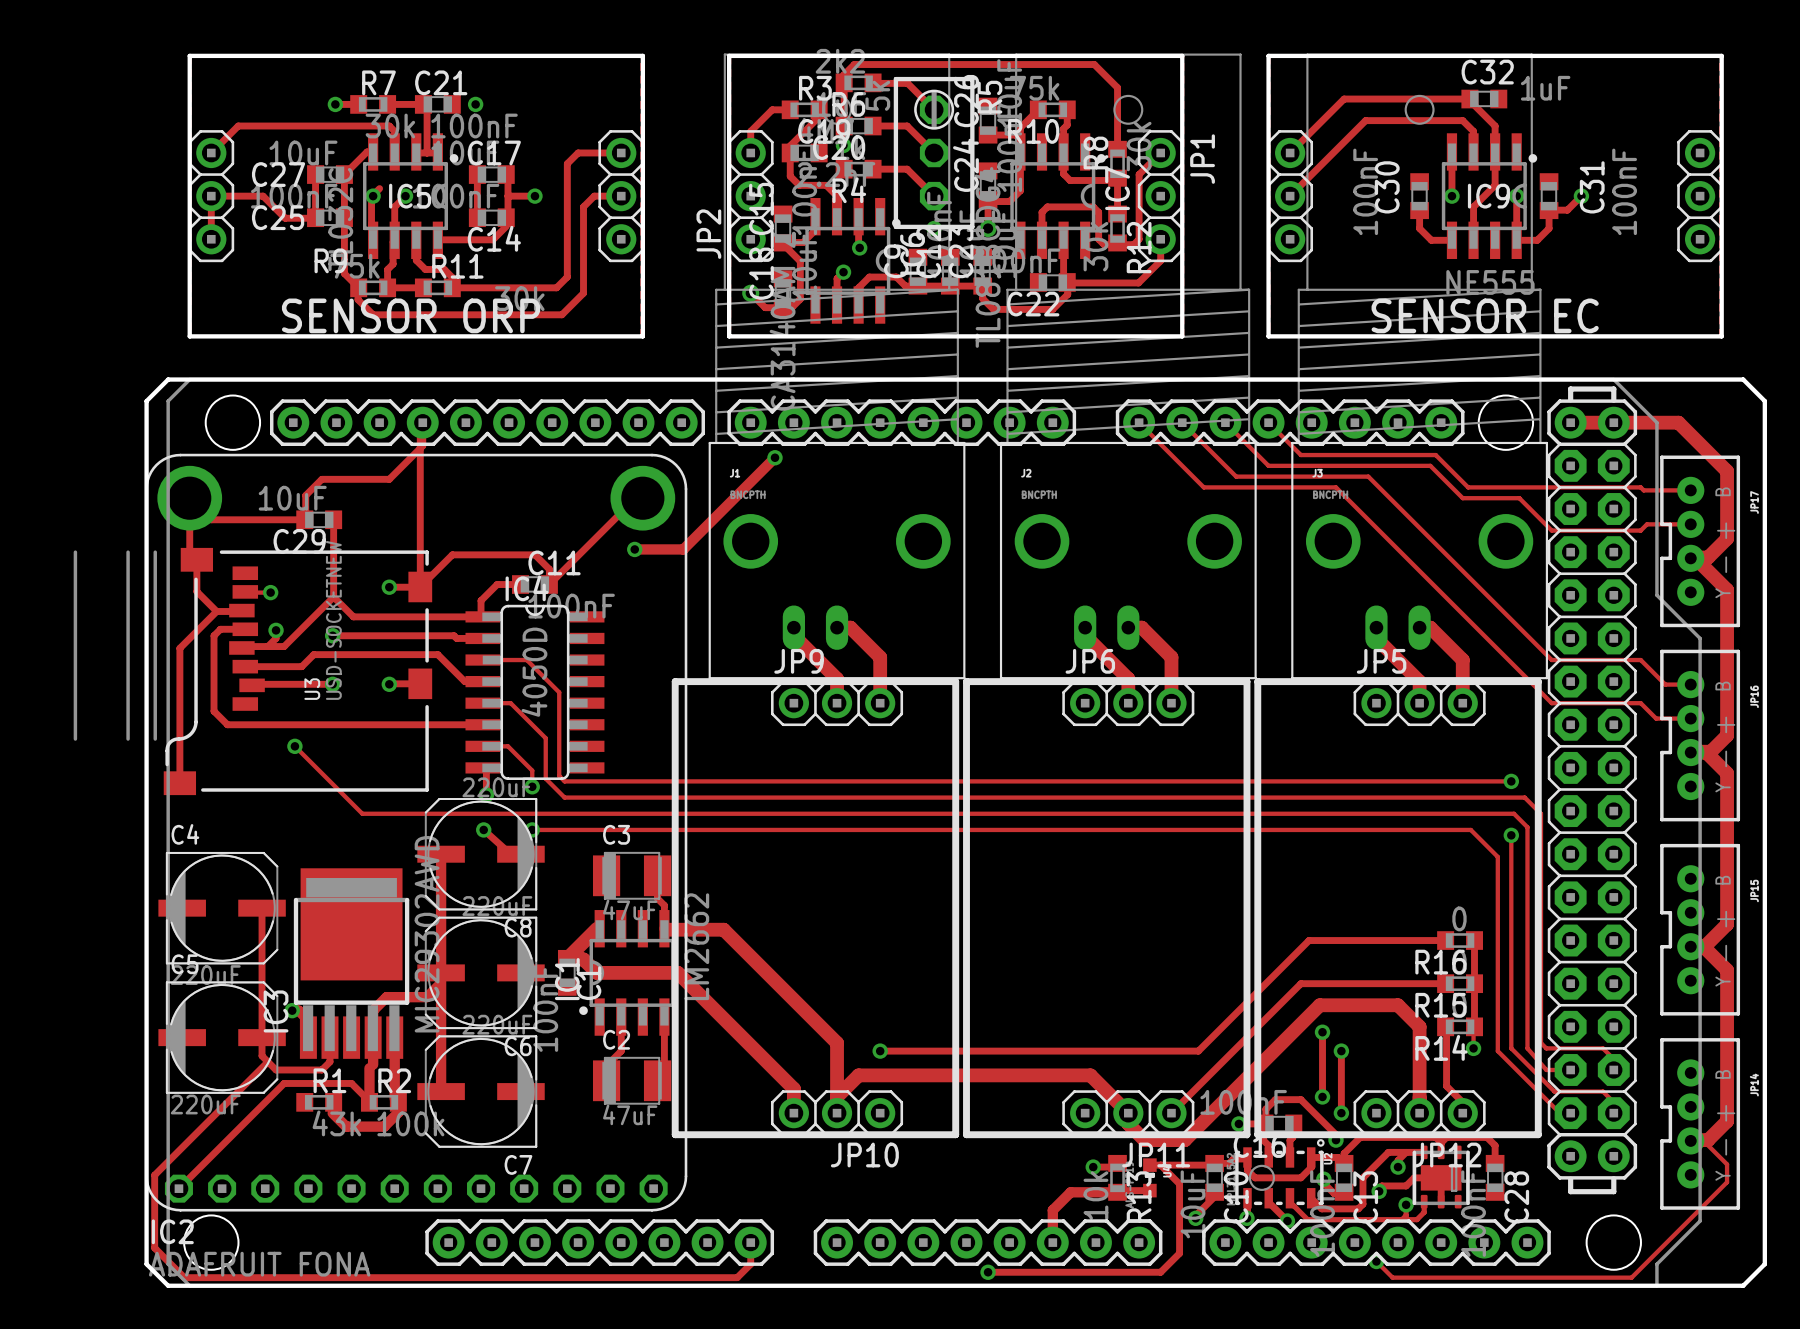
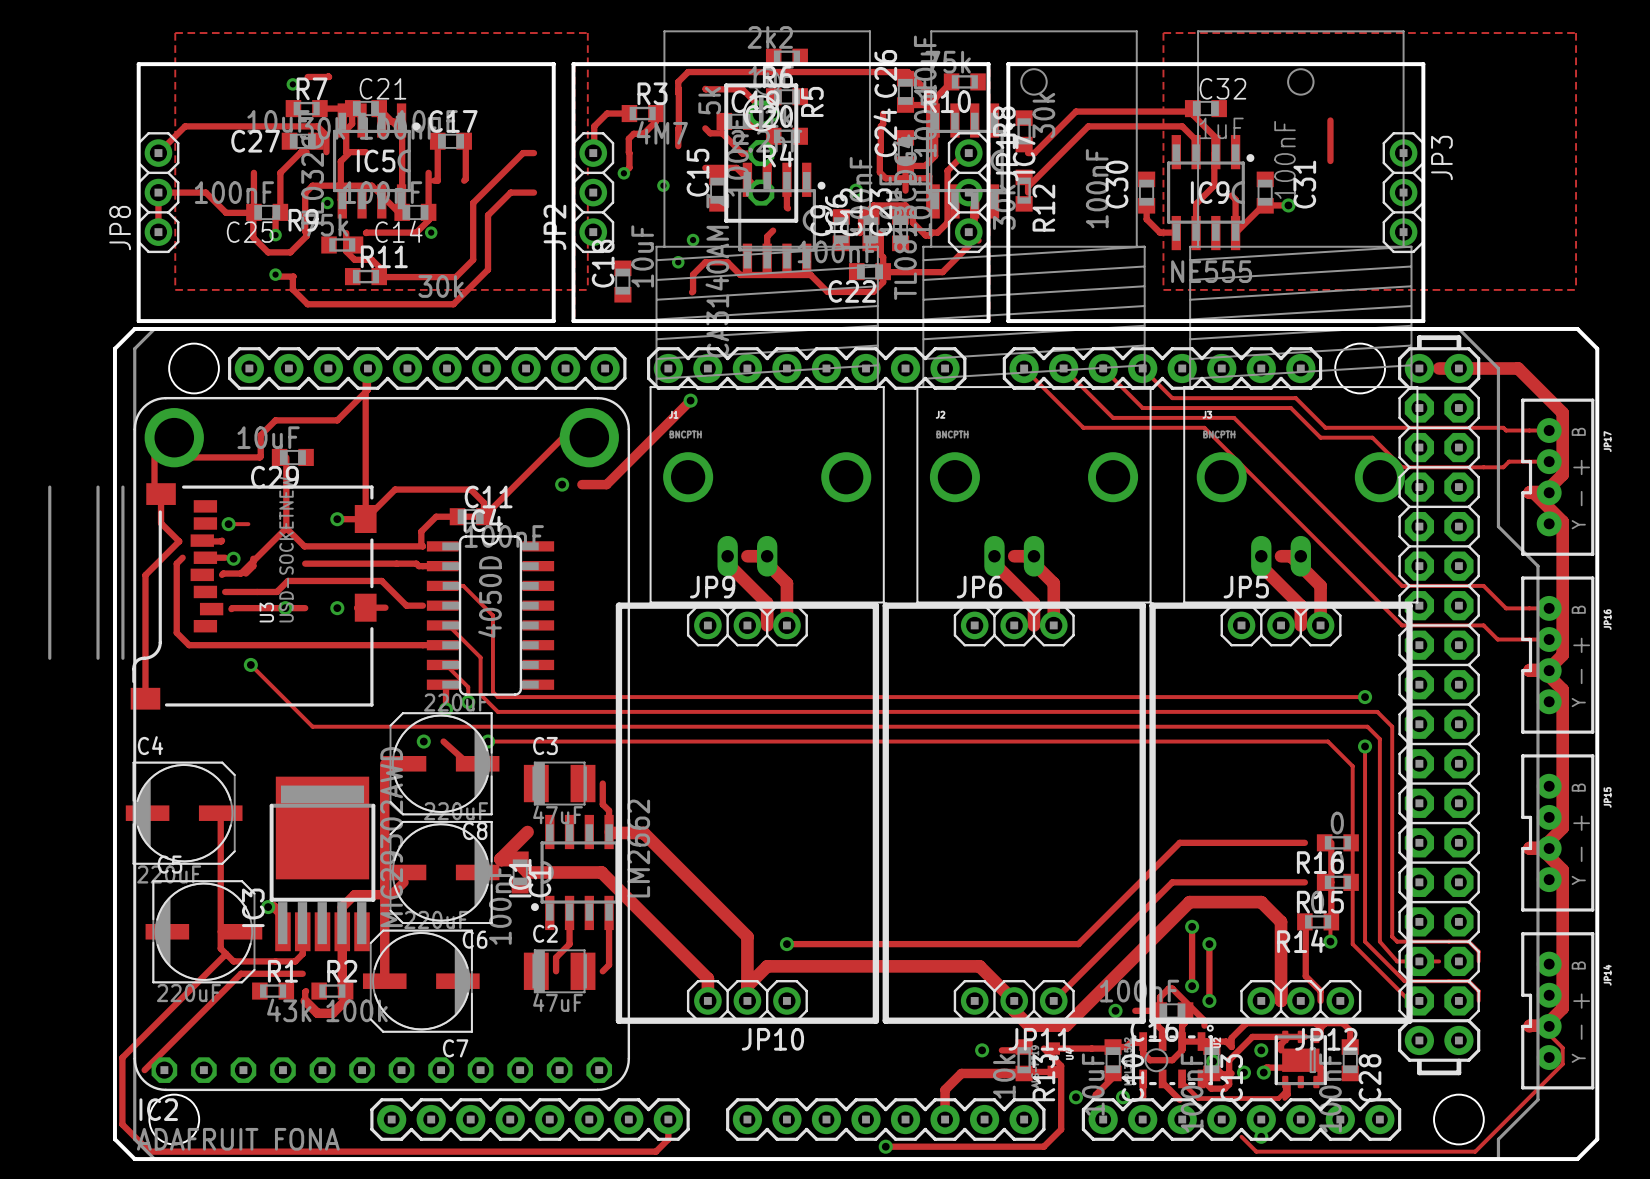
board edge: (189, 55) (642, 55) (642, 336) (189, 336) (189, 55) -> (138, 64) (553, 64) (553, 321) (138, 321) (138, 64)
board edge: (729, 55) (1182, 55) (1182, 336) (729, 336) (729, 55) -> (573, 64) (988, 64) (988, 321) (573, 321) (573, 64)
board edge: (1268, 55) (1721, 55) (1721, 336) (1268, 336) (1268, 55) -> (1008, 64) (1423, 64) (1423, 321) (1008, 321) (1008, 64)
C32 name position: C32 (1487, 72) -> C32 (1222, 88)
C21 name position: C21 (441, 82) -> C21 (382, 88)
track: (873, 82) (907, 83) (934, 109) -> none
C32 value position: 1uF (1545, 88) -> 1uF (1221, 128)
C32 position: (1484, 99) -> (1205, 108)
via: (335, 104) -> none
R7 position: (373, 104) -> (306, 108)
track: (387, 104) (423, 104) (427, 109) (427, 152) -> none
C21 position: (437, 104) -> (365, 108)
via: (475, 104) -> none
track: (790, 109) (772, 109) (750, 131) (750, 152) -> none
R3 position: (804, 109) -> (642, 113)
track: (819, 109) (818, 117) (790, 145) (790, 176) (799, 185) (826, 185) (837, 196) (837, 216) -> none
track: (1068, 111) (1067, 109) (1067, 125) (1063, 128) (1063, 174) (1070, 180) (1115, 180) (1117, 178) (1117, 214) -> none
via: none -> (292, 84)
track: none -> (705, 88) (742, 89) (761, 108) (761, 113)
track: (873, 126) (907, 126) (934, 152) -> none
track: none -> (319, 108) (352, 108) (352, 123) (346, 129) (346, 152) (365, 152)
track: none -> (379, 108) (402, 131) (402, 212) (398, 212) (371, 185) (312, 185) (305, 193) (306, 236) (290, 252) (268, 252) (253, 237) (253, 172)
track: none -> (629, 113) (607, 113) (594, 126) (593, 153)
track: none -> (655, 113) (655, 121) (643, 133) (633, 133) (628, 138) (629, 167) (623, 173)
track: none -> (883, 113) (883, 124) (880, 126) (879, 172) (885, 178) (927, 178) (929, 176) (929, 209)
track: (843, 145) (843, 75) (854, 64) (1094, 64) (1117, 87) (1117, 149) -> (678, 146) (678, 81) (688, 72) (908, 72) (929, 93) (929, 149)
track: (373, 151) (367, 151) (344, 174) (344, 273) (358, 287) (358, 299) (373, 314) (561, 314) (583, 293) (583, 206) (594, 196) (621, 196) -> none
track: (394, 151) (394, 131) (389, 126) (238, 126) (211, 152) -> none
track: (1473, 151) (1473, 131) (1462, 120) (1365, 120) (1290, 196) -> none
track: (621, 152) (578, 152) (567, 163) (567, 277) (556, 287) (452, 287) -> none
R5 position: (934, 152) -> (761, 153)
track: (1160, 152) (1139, 174) (1139, 239) (1133, 244) (1119, 244) (1117, 242) (1115, 244) (1104, 244) (1098, 239) (1098, 212) (1093, 206) (1047, 206) (1042, 212) (1042, 240) -> none
track: (1290, 152) (1344, 99) (1469, 99) (1495, 126) (1495, 185) (1473, 206) (1473, 240) -> none
track: none -> (705, 128) (710, 133) (722, 133) (742, 153) (761, 153)
track: (873, 169) (907, 169) (934, 196) -> (705, 167) (736, 167) (761, 192)
track: (315, 174) (314, 218) (285, 218) (263, 196) (211, 196) (211, 239) -> none
track: none -> (306, 152) (301, 152) (280, 172) (280, 212) (275, 217) (275, 235)
track: none -> (326, 152) (326, 135) (317, 126) (185, 126) (158, 153)
track: none -> (1196, 152) (1197, 141) (1182, 126) (1088, 126) (1028, 186) (1028, 192)
track: none -> (533, 153) (523, 153) (473, 202) (473, 259) (455, 277) (379, 276)
track: none -> (968, 153) (965, 153) (947, 170) (947, 222) (937, 232) (925, 235) (912, 222) (912, 212) (905, 205) (873, 205) (861, 217) (860, 233)
track: none -> (1028, 153) (1034, 153) (1075, 111) (1190, 111) (1192, 108) (1192, 114) (1216, 138) (1216, 151) (1214, 153) (1214, 185) (1196, 203) (1196, 233)
C31 value position: 100nF (1624, 191) -> 100nF (1285, 159)
part: (211, 196) -> none
via: (373, 196) -> none
track: (405, 196) (394, 206) (393, 264) (387, 269) (387, 287) (423, 287) -> none
via: (405, 196) -> none
track: (507, 196) (534, 196) -> none
via: (534, 196) -> none
part: (621, 196) -> none
JP2 position: (750, 196) -> (593, 192)
JP1 position: (1160, 196) -> (968, 192)
part: (1290, 196) -> none
C30 position: (1419, 196) -> (1146, 192)
via: (1451, 196) -> none
IC9 position: (1489, 196) -> (1210, 192)
track: (1516, 196) (1516, 240) (1537, 240) (1549, 228) (1549, 210) -> none
via: (1516, 196) -> none
C31 position: (1549, 196) -> (1265, 192)
track: (1581, 196) (1567, 210) (1549, 210) -> none
via: (1581, 196) -> none
part: (1700, 196) -> none
track: none -> (428, 172) (428, 220) (416, 232) (365, 233)
via: none -> (623, 173)
track: (1419, 210) (1419, 228) (1431, 240) (1451, 240) -> none
track: (815, 216) (815, 230) (803, 242) (783, 242) (800, 261) (800, 299) (792, 307) (765, 307) (750, 293) -> none
C25 name position: C25 (278, 217) -> C25 (250, 232)
C25 position: (329, 217) -> (267, 212)
C14 position: (491, 217) -> (415, 212)
via: none -> (663, 185)
track: (506, 226) (492, 239) (437, 240) -> none
via: (988, 228) -> none
JP8: none -> (158, 192)
track: none -> (533, 192) (510, 192) (488, 215) (488, 269) (453, 304) (307, 304) (292, 289) (293, 276) (277, 276) (275, 274)
JP3: none -> (1403, 192)
track: none -> (1231, 195) (1235, 199) (1235, 233) (1262, 205) (1288, 205)
C14 name position: C14 (494, 238) -> C14 (398, 231)
track: (1160, 239) (1160, 260) (1138, 282) (1067, 282) (1067, 294) (1052, 309) (993, 309) (982, 298) (982, 286) (905, 286) (896, 277) (869, 277) (858, 287) (858, 305) (859, 303) -> none
track: (416, 240) (416, 260) (425, 269) (444, 269) (452, 277) (452, 287) -> (346, 233) (346, 251) (354, 259) (371, 259) (379, 267) (379, 276)
via: none -> (327, 202)
via: none -> (1288, 205)
track: none -> (1146, 205) (1146, 219) (1159, 232) (1176, 233)
via: (859, 247) -> none
track: none -> (253, 212) (226, 212) (205, 192) (158, 192) (158, 232)
via: (843, 272) -> none
track: none -> (968, 232) (968, 245) (942, 272) (883, 271)
via: none -> (431, 232)
track: none -> (879, 233) (880, 254) (883, 257) (883, 282) (873, 291) (827, 291) (810, 275) (740, 275) (727, 262) (705, 262) (693, 274) (692, 292)
via: none -> (275, 235)
via: none -> (693, 240)
C22 position: (1052, 282) -> (869, 271)
R11 position: (437, 287) -> (365, 276)
via: (750, 293) -> none
C18 position: (783, 293) -> (622, 281)
via: none -> (678, 262)
text: SENSOR ORP (411, 315) -> none
text: SENSOR EC (1485, 315) -> none
via: none -> (275, 274)
board edge: (168, 379) (146, 401) (146, 1264) (168, 1285) -> (154, 328) (134, 328) (114, 348) (114, 1139) (134, 1159) (154, 1159)
board edge: (1721, 379) (1743, 379) (1764, 401) (1764, 1264) (1743, 1285) (1721, 1285) -> (1577, 328) (1597, 348) (1597, 1139) (1577, 1159)
track: (1139, 422) (1203, 487) -> (1024, 368) (1083, 427) (1103, 427)
track: (1182, 422) (1236, 476) -> (1063, 368) (1113, 417) (1132, 417)
track: (1225, 422) (1268, 465) -> (1103, 368) (1142, 408) (1162, 408)
track: (1268, 422) (1300, 455) -> (1142, 368) (1172, 398) (1192, 398)
track: (1656, 422) (1678, 422) (1727, 471) (1727, 538) (1708, 557) (1690, 558) (1695, 558) (1727, 589) (1727, 735) (1710, 751) (1690, 752) (1706, 752) (1727, 773) (1727, 924) (1705, 945) (1690, 946) (1703, 946) (1727, 970) (1727, 1121) (1708, 1140) (1690, 1140) (1703, 1140) (1727, 1164) (1727, 1182) (1631, 1277) (1610, 1277) -> (1518, 368) (1562, 412) (1562, 474) (1545, 492) (1529, 492) (1533, 492) (1562, 521) (1562, 655) (1547, 669) (1529, 670) (1543, 670) (1562, 689) (1562, 828) (1542, 847) (1529, 848) (1541, 848) (1562, 870) (1562, 1008) (1545, 1025) (1529, 1026) (1541, 1026) (1562, 1047) (1562, 1064) (1475, 1151)
track: (1414, 455) (1435, 455) (1468, 487) -> (1295, 398) (1325, 427) (1345, 427)
track: (775, 457) (683, 549) (661, 549) -> (690, 400) (606, 484)
via position: (775, 457) -> (690, 400)
track: (1408, 465) (1430, 465) (1462, 498) -> (1290, 408) (1320, 437) (1340, 437)
track: (1346, 476) (1368, 476) (1551, 660) -> (1234, 417) (1402, 585) (1421, 585)
track: (321, 479) (305, 495) (305, 518) (283, 519) -> (295, 420) (275, 420) (260, 435) (259, 457)
track: (367, 479) (389, 479) (422, 445) (422, 422) (420, 425) (420, 586) -> (337, 420) (367, 389) (367, 368) (365, 370) (365, 518)
track: (1314, 487) (1335, 487) (1551, 703) -> (1204, 427) (1402, 625) (1421, 625)
track: (642, 498) (635, 498) (549, 584) (549, 569) (534, 554) (513, 554) -> (569, 437) (563, 437) (483, 516) (483, 502) (470, 489)
track: (1497, 498) (1519, 498) (1551, 530) -> (1372, 437) (1402, 467) (1421, 467)
track: (211, 519) (189, 498) (189, 552) (196, 559) (196, 591) (216, 611) (198, 629) -> (194, 457) (174, 457) (154, 437) (154, 487) (161, 494) (161, 523) (179, 541) (145, 575) (145, 698)
track: (333, 519) (333, 597) -> (286, 457) (286, 528)
via position: (634, 549) -> (562, 484)
track: (452, 554) (420, 587) (398, 587) -> (414, 489) (395, 489) (365, 519)
track: (497, 584) (481, 600) (481, 615) (482, 616) (461, 616) -> (455, 516) (436, 516) (421, 531) (422, 546)
C11 position: (534, 584) -> (470, 516)
track: none -> (337, 519) (357, 519)
via position: (389, 587) -> (337, 519)
via: none -> (228, 524)
via: (270, 592) -> none
track: (333, 597) (284, 646) (262, 646) -> (286, 528) (240, 573)
track: (333, 597) (353, 616) -> (286, 528) (304, 546) (324, 546)
track: (837, 627) (850, 627) (880, 657) (880, 703) -> (747, 556) (759, 556) (786, 583) (786, 625)
track: (1128, 627) (1141, 627) (1171, 657) (1171, 703) -> (1014, 556) (1026, 556) (1053, 583) (1053, 625)
track: (1419, 627) (1430, 627) (1462, 660) (1462, 703) -> (1281, 556) (1290, 556) (1320, 585) (1320, 625)
track: (220, 629) (214, 635) (214, 711) (227, 724) -> (176, 563) (176, 632) (189, 645) (208, 645)
via: none -> (233, 558)
via: (276, 630) -> none
track: (192, 635) (179, 648) (179, 783) -> none
via: (332, 635) -> none
track: (416, 654) (437, 654) (464, 681) (482, 681) -> (381, 580) (406, 605) (422, 605)
track: (505, 660) (526, 660) (559, 692) (559, 776) (564, 781) -> (463, 585) (492, 615) (492, 692) (497, 697) (517, 697)
track: (1619, 660) (1640, 660) (1665, 684) -> (1483, 585) (1506, 608) (1525, 608)
U3 position: (252, 671) -> (212, 596)
via: none -> (285, 608)
via: (332, 684) -> none
via: none -> (337, 608)
via: (389, 684) -> none
track: (489, 703) (510, 703) (545, 738) (545, 778) (564, 797) -> (448, 625) (480, 657) (480, 694) (497, 711) (517, 711)
JP9 position: (837, 703) -> (747, 625)
JP6 position: (1128, 703) -> (1014, 625)
JP5 position: (1419, 703) -> (1281, 625)
track: (1619, 703) (1640, 703) (1656, 718) -> (1483, 625) (1497, 639) (1517, 639)
track: (294, 746) (362, 813) -> (250, 664) (312, 726) (332, 726)
via position: (294, 746) -> (250, 664)
track: (486, 746) (507, 746) (532, 770) (532, 786) -> (446, 664) (468, 687) (468, 702)
track: (1489, 781) (1511, 781) -> none
via position: (1511, 781) -> (1365, 697)
via position: (532, 786) -> (468, 702)
track: (1503, 797) (1524, 797) (1540, 813) (1540, 1043) (1546, 1048) -> (1377, 711) (1392, 726) (1392, 936) (1397, 941) (1416, 941)
track: (1492, 813) (1514, 813) (1527, 827) (1527, 1048) (1546, 1069) -> (1367, 726) (1379, 739) (1379, 941) (1397, 961) (1416, 961)
via position: (483, 829) -> (423, 741)
track: (1449, 829) (1470, 829) (1497, 856) (1497, 1051) (1559, 1113) (1570, 1113) -> (1327, 741) (1352, 766) (1352, 944) (1409, 1000) (1419, 1000)
part position: (934, 832) -> (836, 744)
track: (1511, 835) (1511, 1048) (1554, 1091) -> (1365, 746) (1365, 941) (1404, 981) (1424, 981)
via position: (1511, 835) -> (1365, 746)
track: (441, 854) (441, 1091) -> (384, 763) (384, 981)
C3 position: (632, 875) -> (559, 783)
C4 position: (222, 908) -> (184, 813)
track: (262, 908) (262, 1055) (276, 1069) -> (220, 813) (220, 948) (233, 961) (253, 961)
track: (599, 928) (597, 928) (567, 958) (583, 959) (597, 972) -> (530, 832) (527, 832) (500, 859) (515, 860) (527, 872) (547, 872)
track: (702, 929) (723, 929) (837, 1043) (837, 1113) (837, 1096) (858, 1075) -> (643, 832) (747, 936) (747, 1000) (747, 986) (767, 966) (786, 966)
track: (1309, 940) (1198, 1051) (1176, 1051) -> (1199, 842) (1179, 842) (1078, 944)
track: (1424, 940) (1445, 940) -> none
track: (1474, 940) (1473, 1048) -> (1331, 842) (1330, 941)
track: (656, 972) (677, 972) (793, 1088) (793, 1113) -> (601, 872) (707, 978) (707, 1000)
track: (1300, 983) (1171, 1113) -> (1192, 882) (1172, 882) (1053, 1000)
track: (1424, 983) (1445, 983) -> none
track: (1319, 1005) (1184, 1140) (1163, 1140) -> (1209, 902) (1189, 902) (1066, 1025)
track: (1376, 1005) (1398, 1005) (1419, 1026) (1419, 1113) -> (1261, 902) (1281, 921) (1281, 1000)
R14 position: (1460, 1026) -> (1318, 921)
track: (1443, 1028) (1446, 1027) (1446, 1086) (1462, 1102) (1462, 1113) -> (1303, 923) (1305, 922) (1305, 976) (1320, 991) (1320, 1000)
via: none -> (1192, 926)
track: (1322, 1032) (1322, 1096) -> (1192, 926) (1192, 986)
via: (1322, 1032) -> none
track: (394, 1037) (394, 1098) (398, 1102) (398, 1112) (384, 1126) (362, 1126) -> (342, 956) (342, 987) (345, 991) (345, 1000) (332, 1013)
via position: (1473, 1048) -> (1330, 941)
track: none -> (786, 944) (806, 944)
via position: (880, 1051) -> (786, 944)
via: none -> (1209, 944)
track: (1341, 1051) (1341, 1113) -> (1209, 944) (1209, 1000)
via: (1341, 1051) -> none
track: (267, 1061) (154, 1175) (154, 1247) (184, 1277) -> (226, 954) (122, 1057) (122, 1124) (149, 1151) (169, 1151)
track: (373, 1064) (369, 1068) (369, 1102) (351, 1083) (329, 1083) -> none
track: (1068, 1075) (1090, 1075) (1128, 1113) (1128, 1123) (1144, 1140) -> (979, 966) (1014, 1000) (1014, 1010) (1029, 1025) (1048, 1025)
C2 position: (632, 1080) -> (559, 971)
track: (284, 1083) (178, 1188) -> (260, 973) (240, 973) (144, 1070)
C7 position: (481, 1091) -> (421, 981)
via: none -> (1192, 986)
via: (1322, 1096) -> none
track: (1279, 1099) (1300, 1099) (1335, 1134) (1335, 1140) -> (1172, 988) (1204, 1020) (1204, 1025)
R1 position: (319, 1102) -> (273, 991)
R2 position: (383, 1102) -> (332, 991)
JP10 position: (837, 1113) -> (747, 1000)
JP11 position: (1128, 1113) -> (1014, 1000)
via: none -> (1209, 1000)
via: (1341, 1113) -> none
via position: (1238, 1123) -> (1115, 1010)
track: (1465, 1137) (1487, 1137) (1495, 1145) (1495, 1163) -> (1342, 1023) (1350, 1030) (1350, 1047)
via: (1335, 1140) -> none
track: (1388, 1152) (1362, 1177) (1362, 1204) (1358, 1208) (1336, 1208) -> (1272, 1036) (1252, 1036) (1229, 1060) (1229, 1084) (1224, 1088)
track: (1311, 1157) (1311, 1167) (1300, 1177) (1279, 1177) -> (1201, 1041) (1181, 1041) (1182, 1050) (1172, 1060)
track: (1160, 1165) (1179, 1184) (1179, 1253) (1160, 1272) (1139, 1272) -> (1043, 1048) (1061, 1065) (1061, 1129) (1043, 1146)
via position: (1093, 1167) -> (982, 1050)
via position: (1398, 1167) -> (1261, 1050)
C13 position: (1344, 1177) -> (1211, 1060)
part position: (1441, 1177) -> (1300, 1059)
C28 position: (1495, 1177) -> (1350, 1060)
via: none -> (1243, 1072)
track: (1070, 1192) (1052, 1210) (1052, 1242) -> (981, 1073) (961, 1073) (945, 1089) (945, 1119)
track: (1424, 1201) (1424, 1212) (1416, 1219) (1395, 1219) -> (1285, 1082) (1285, 1091) (1278, 1098)
via: (1406, 1204) -> none
via: none -> (1075, 1097)
via: (1195, 1218) -> none
via: none -> (1122, 1097)
via: (1246, 1218) -> none
via: (1287, 1221) -> none
track: (750, 1242) (750, 1264) (737, 1277) (715, 1277) -> (668, 1119) (668, 1139) (656, 1151)
track: (1376, 1261) (1392, 1277) -> (1241, 1136) (1256, 1151) (1276, 1151)
track: none -> (885, 1146) (905, 1146)
via position: (988, 1272) -> (885, 1146)

